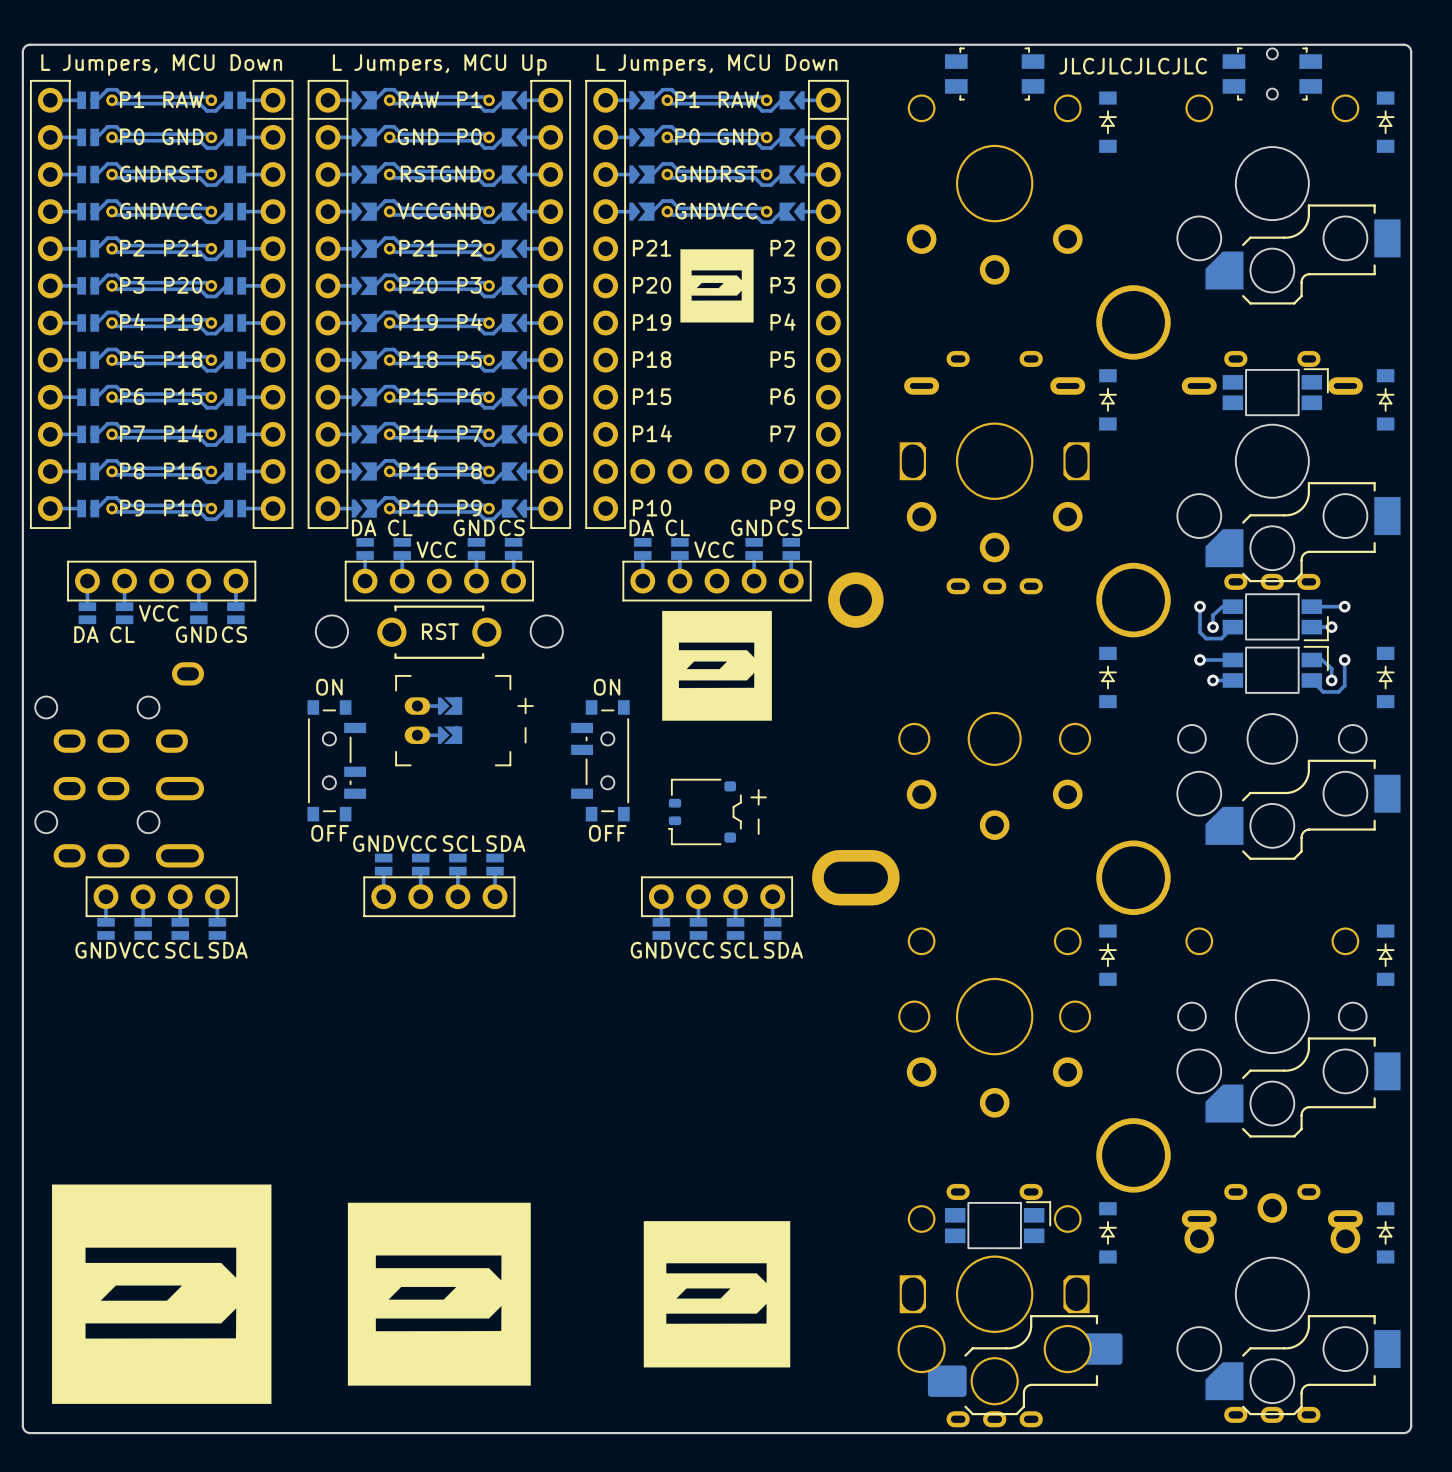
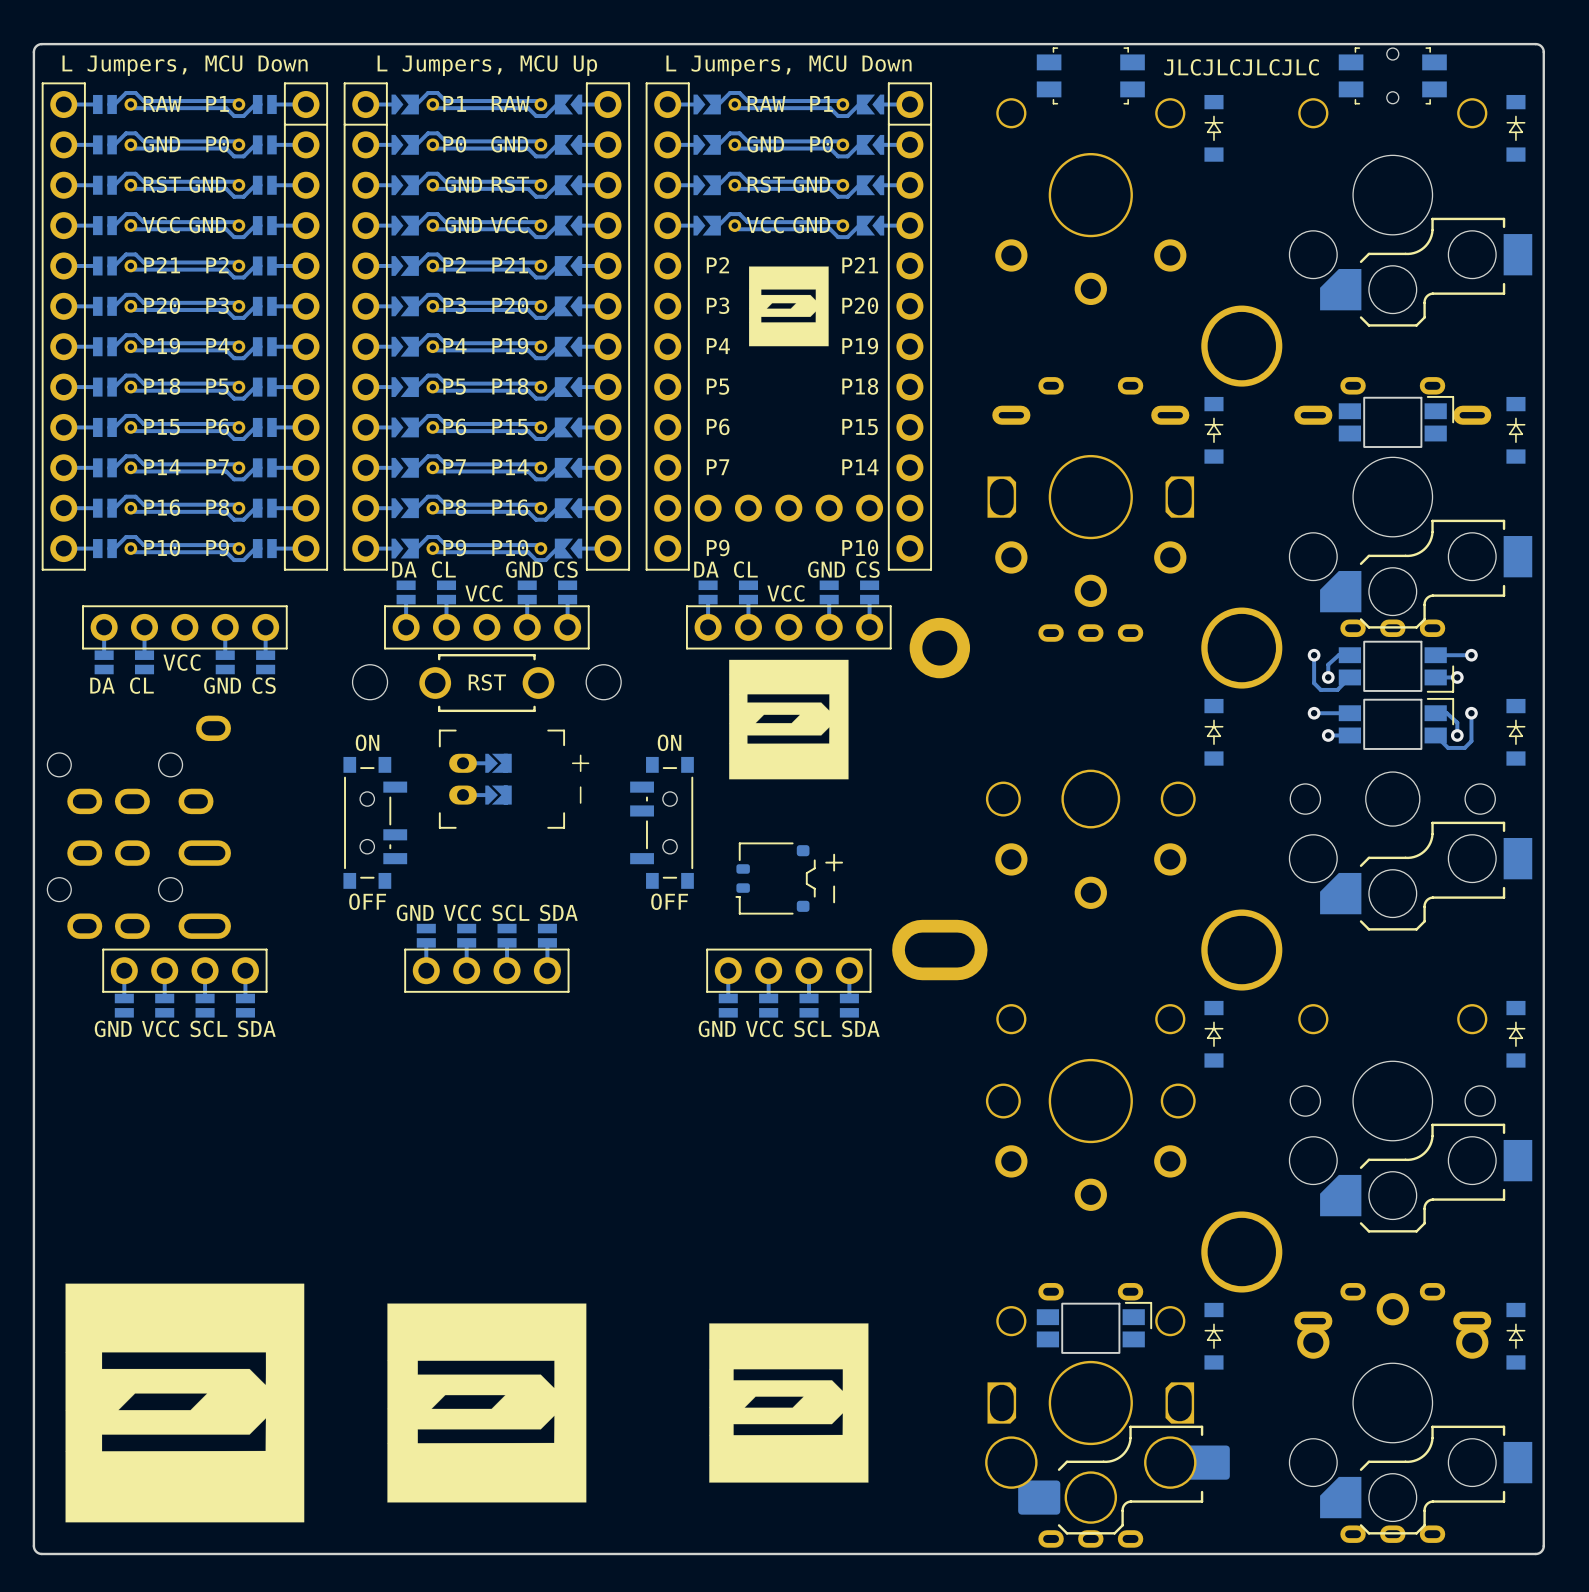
part footprint: [30, 79, 294, 529] -> [41, 82, 329, 571]
part footprint: [307, 79, 572, 529] -> [343, 82, 631, 571]
part footprint: [585, 79, 849, 529] -> [645, 82, 933, 571]

